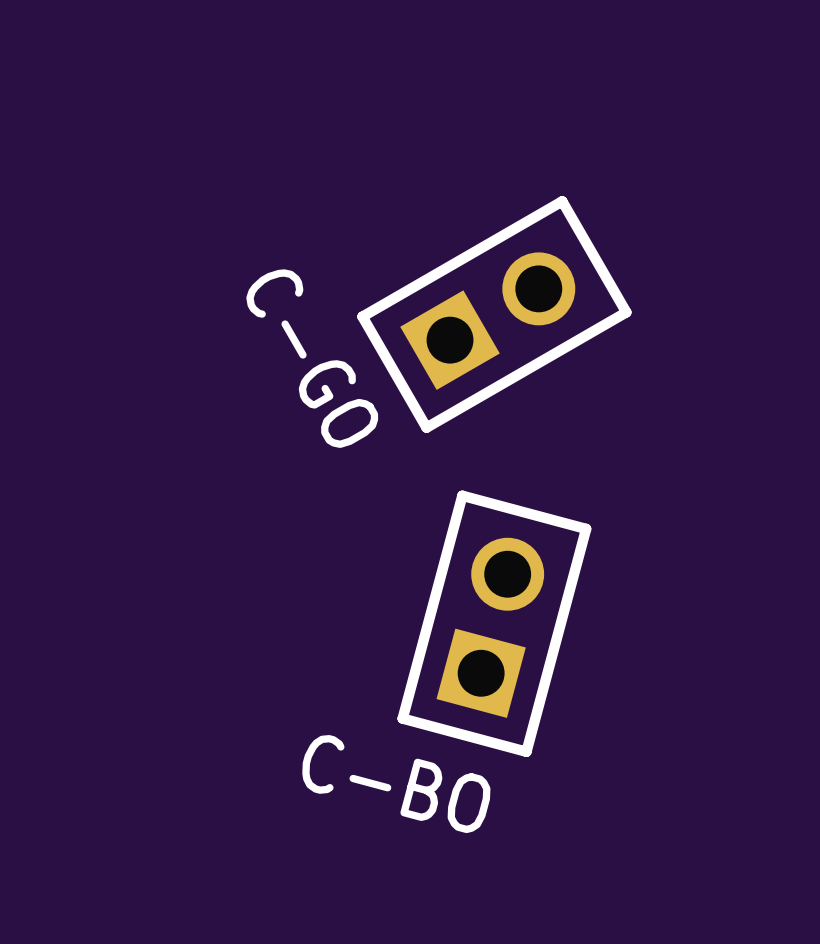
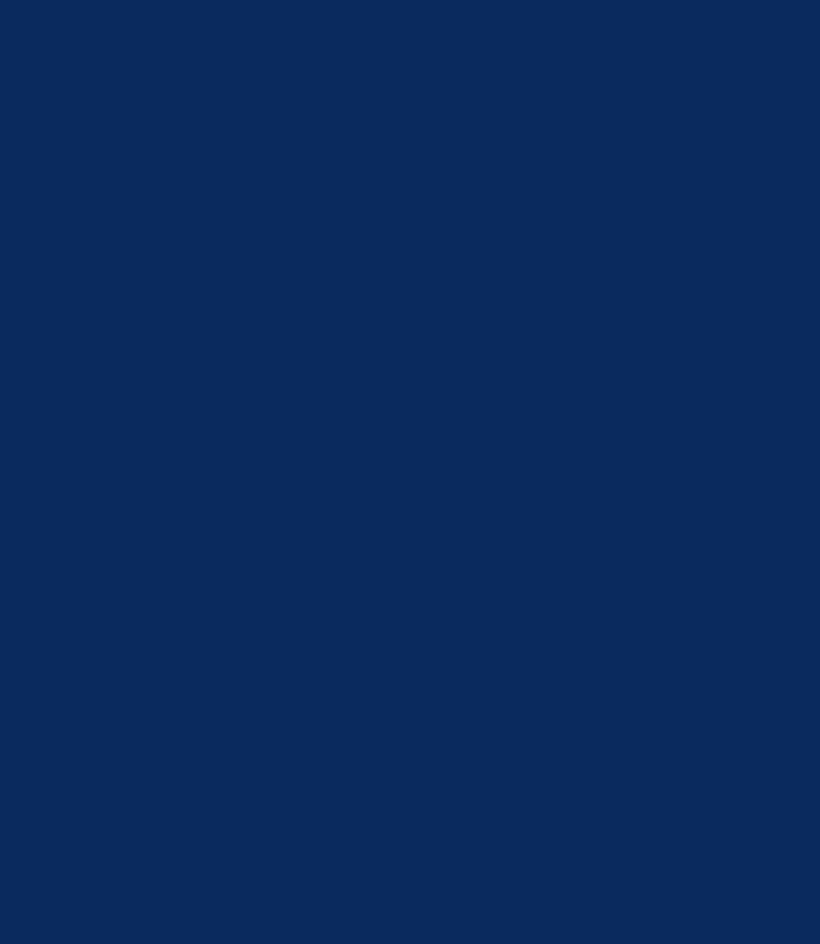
C-GO: (494, 314) -> none
C-BO: (494, 623) -> none

